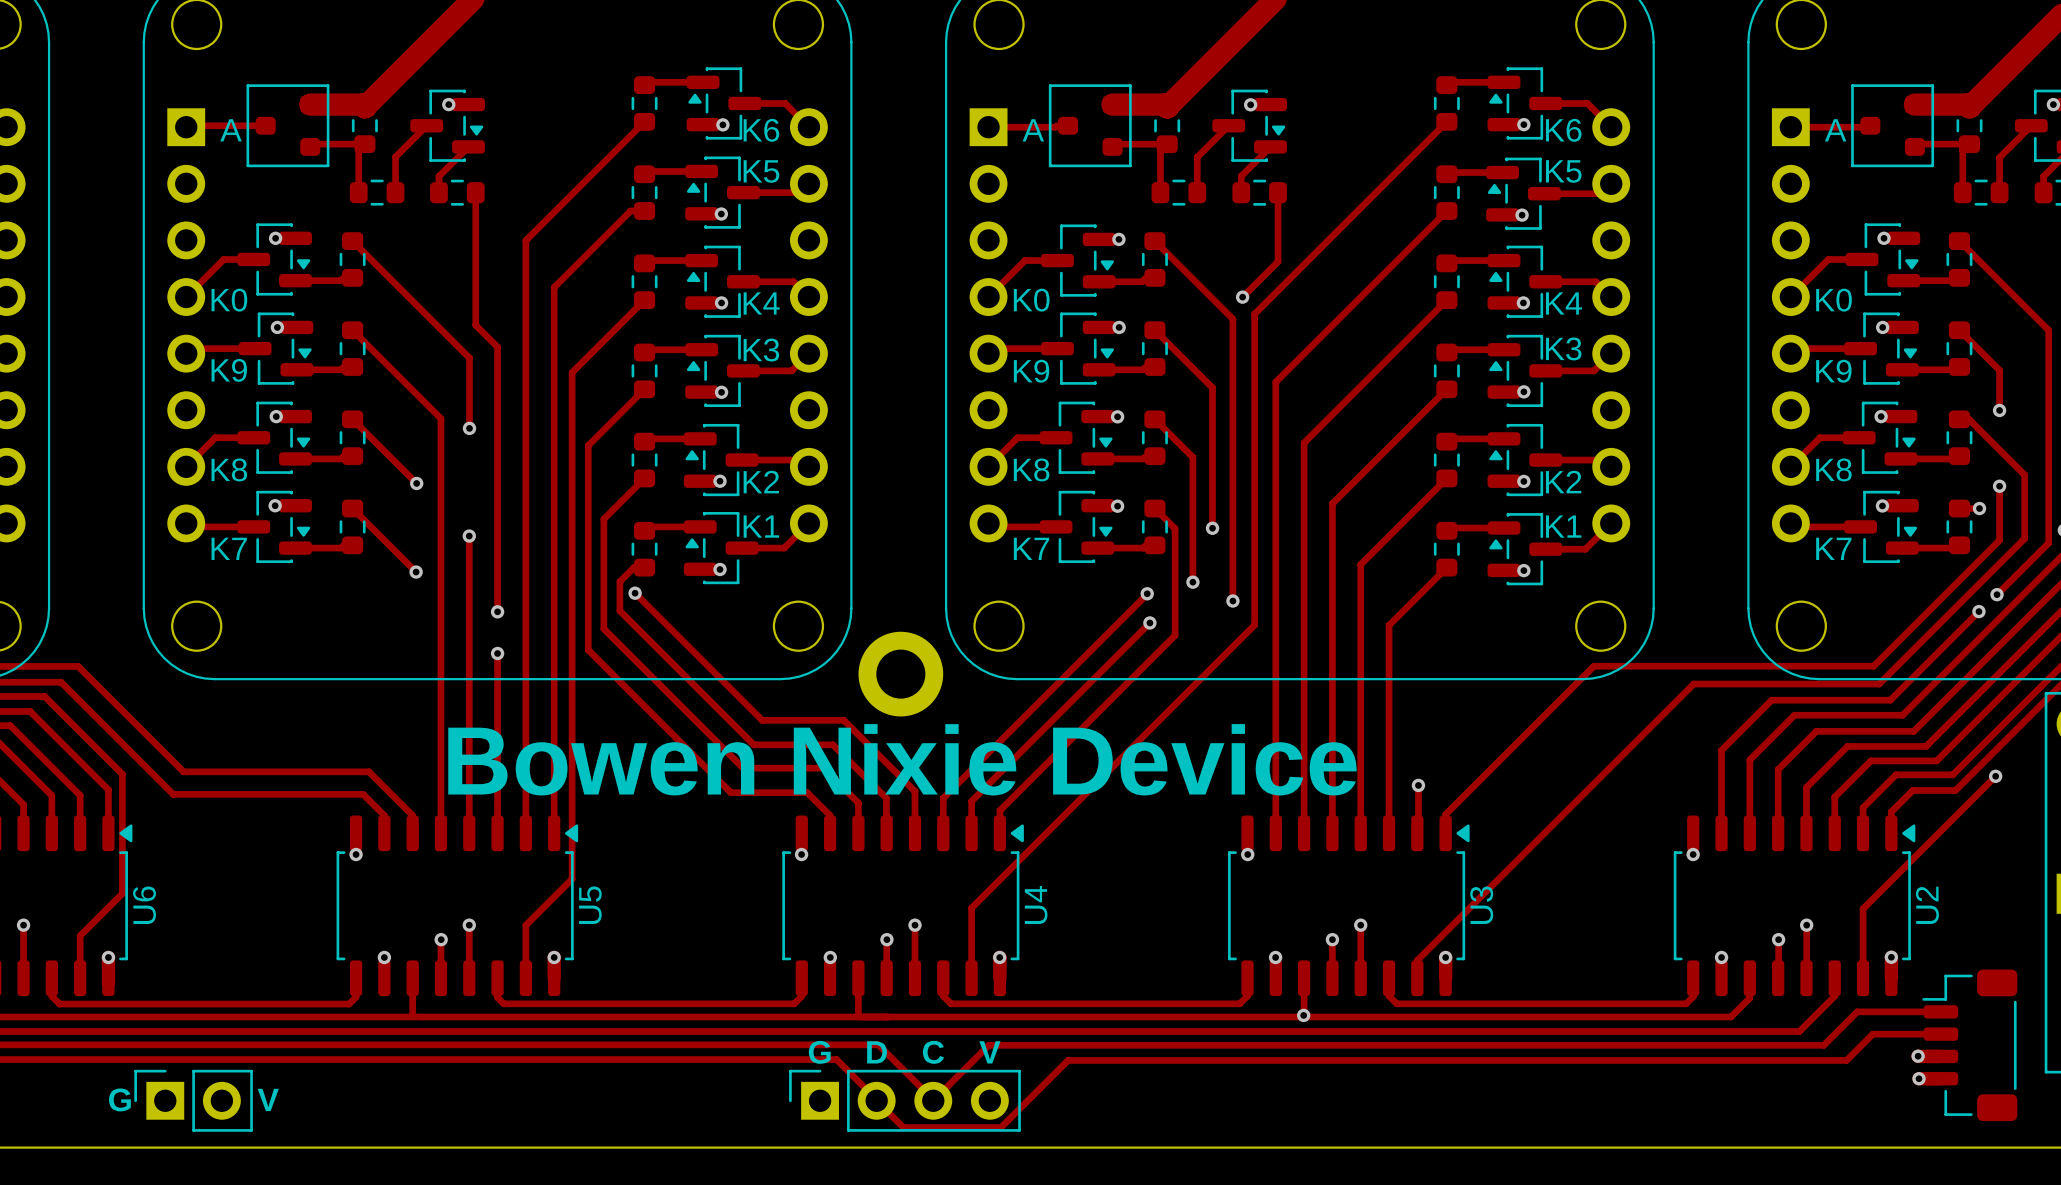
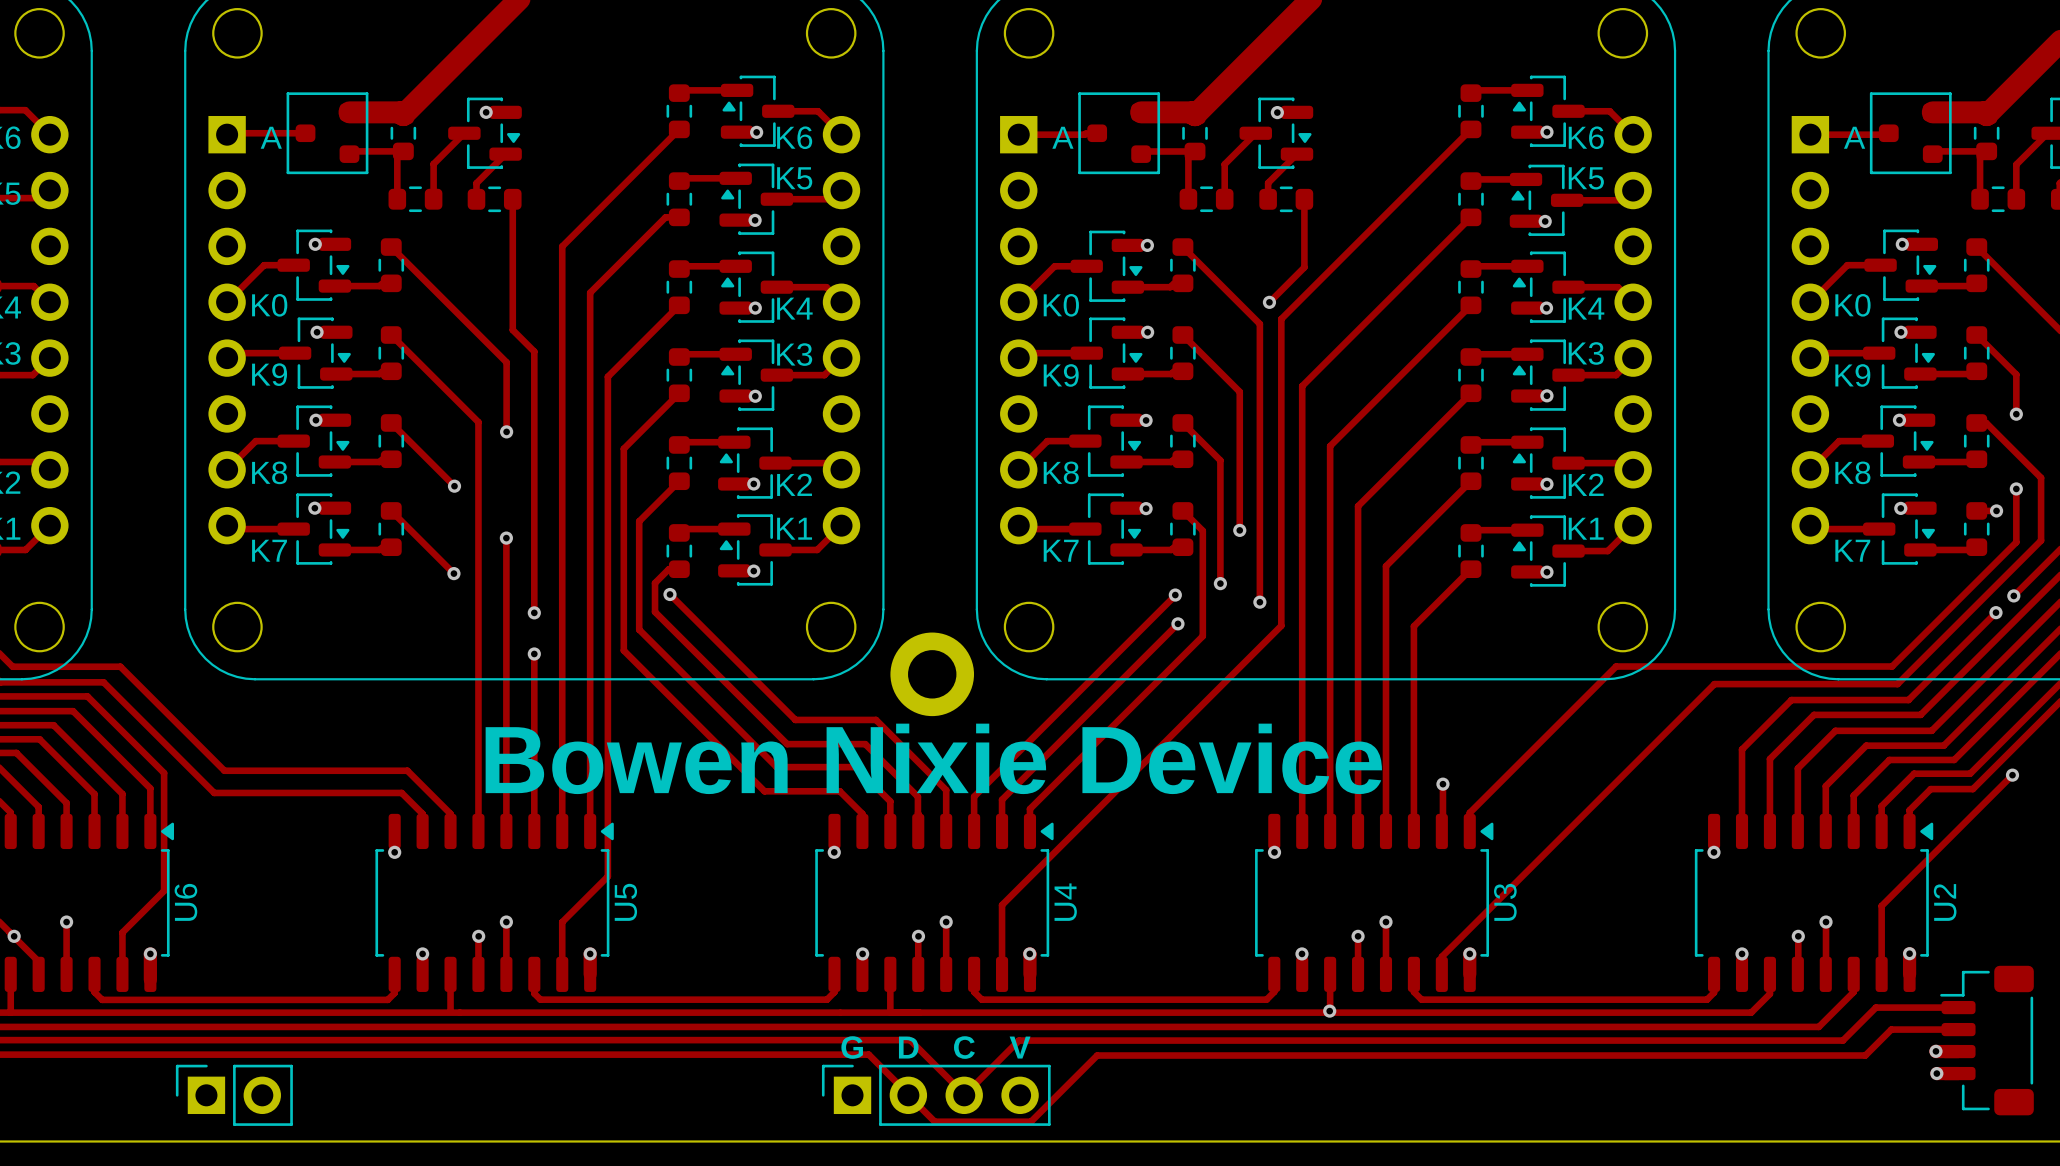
text: G (119, 1099) -> none
text: V (268, 1099) -> none

